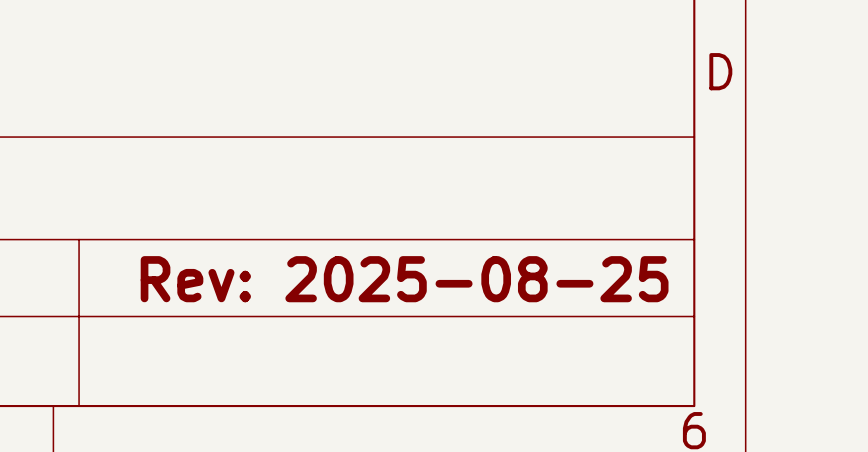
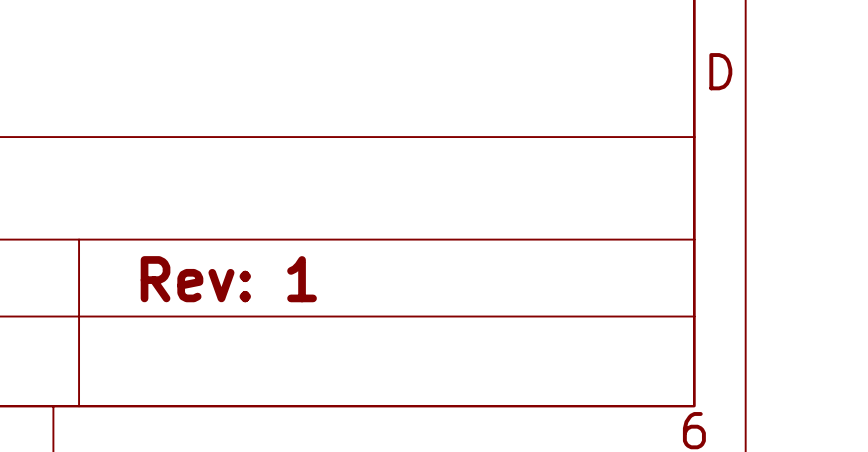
title block: Rev: 2025-08-25 (404, 279) -> Rev: 1 (228, 279)

